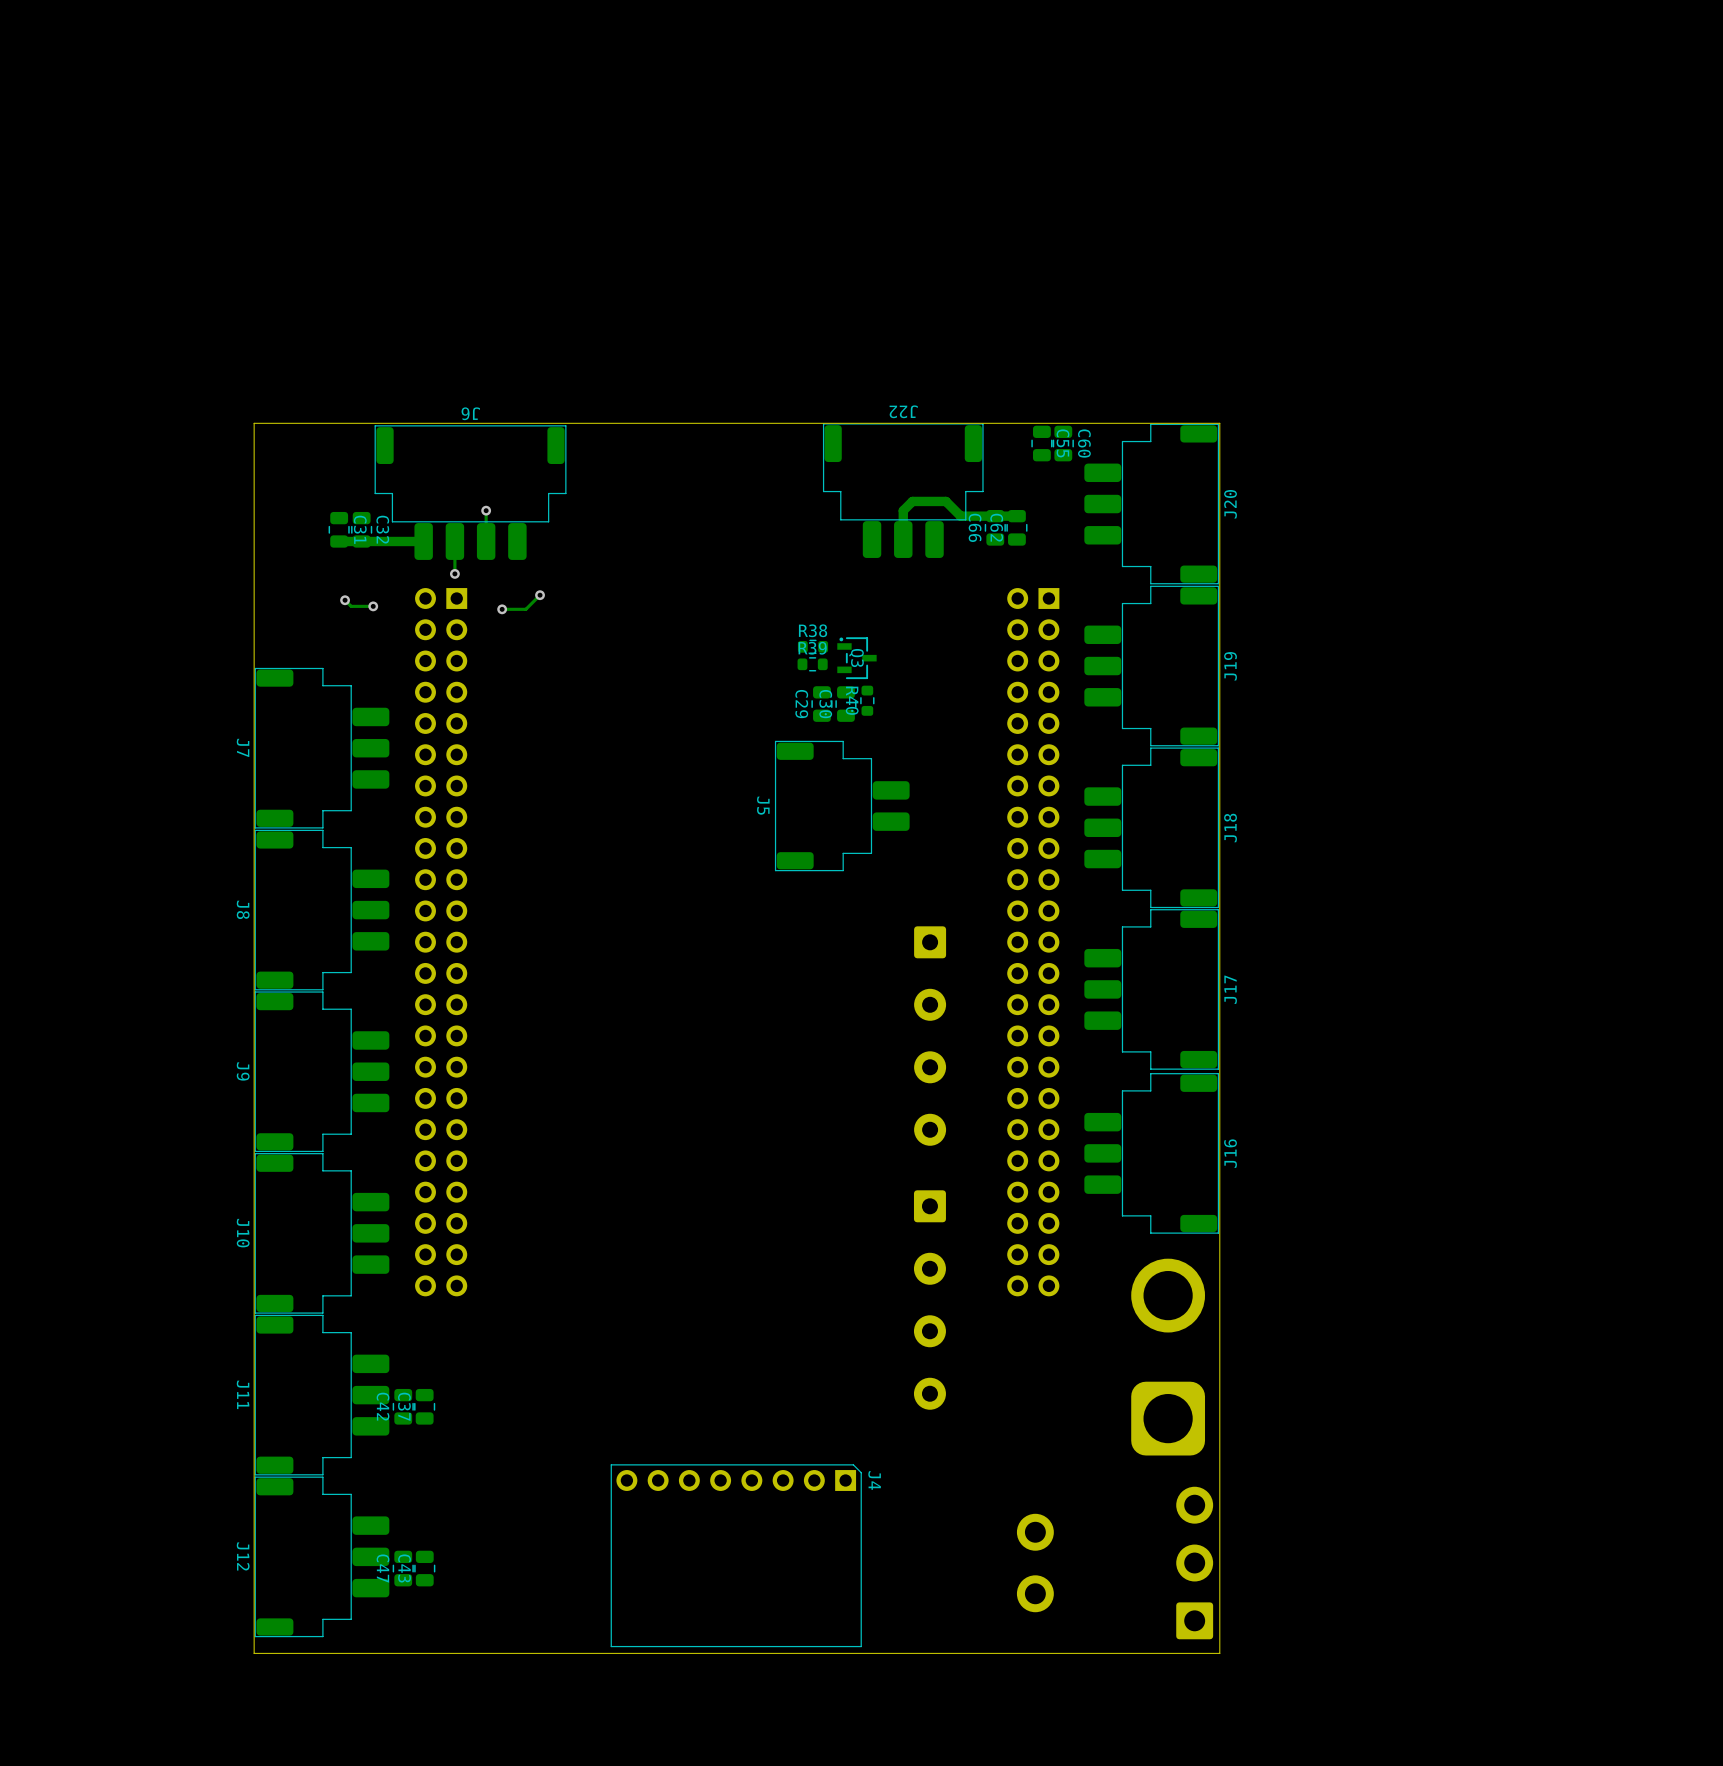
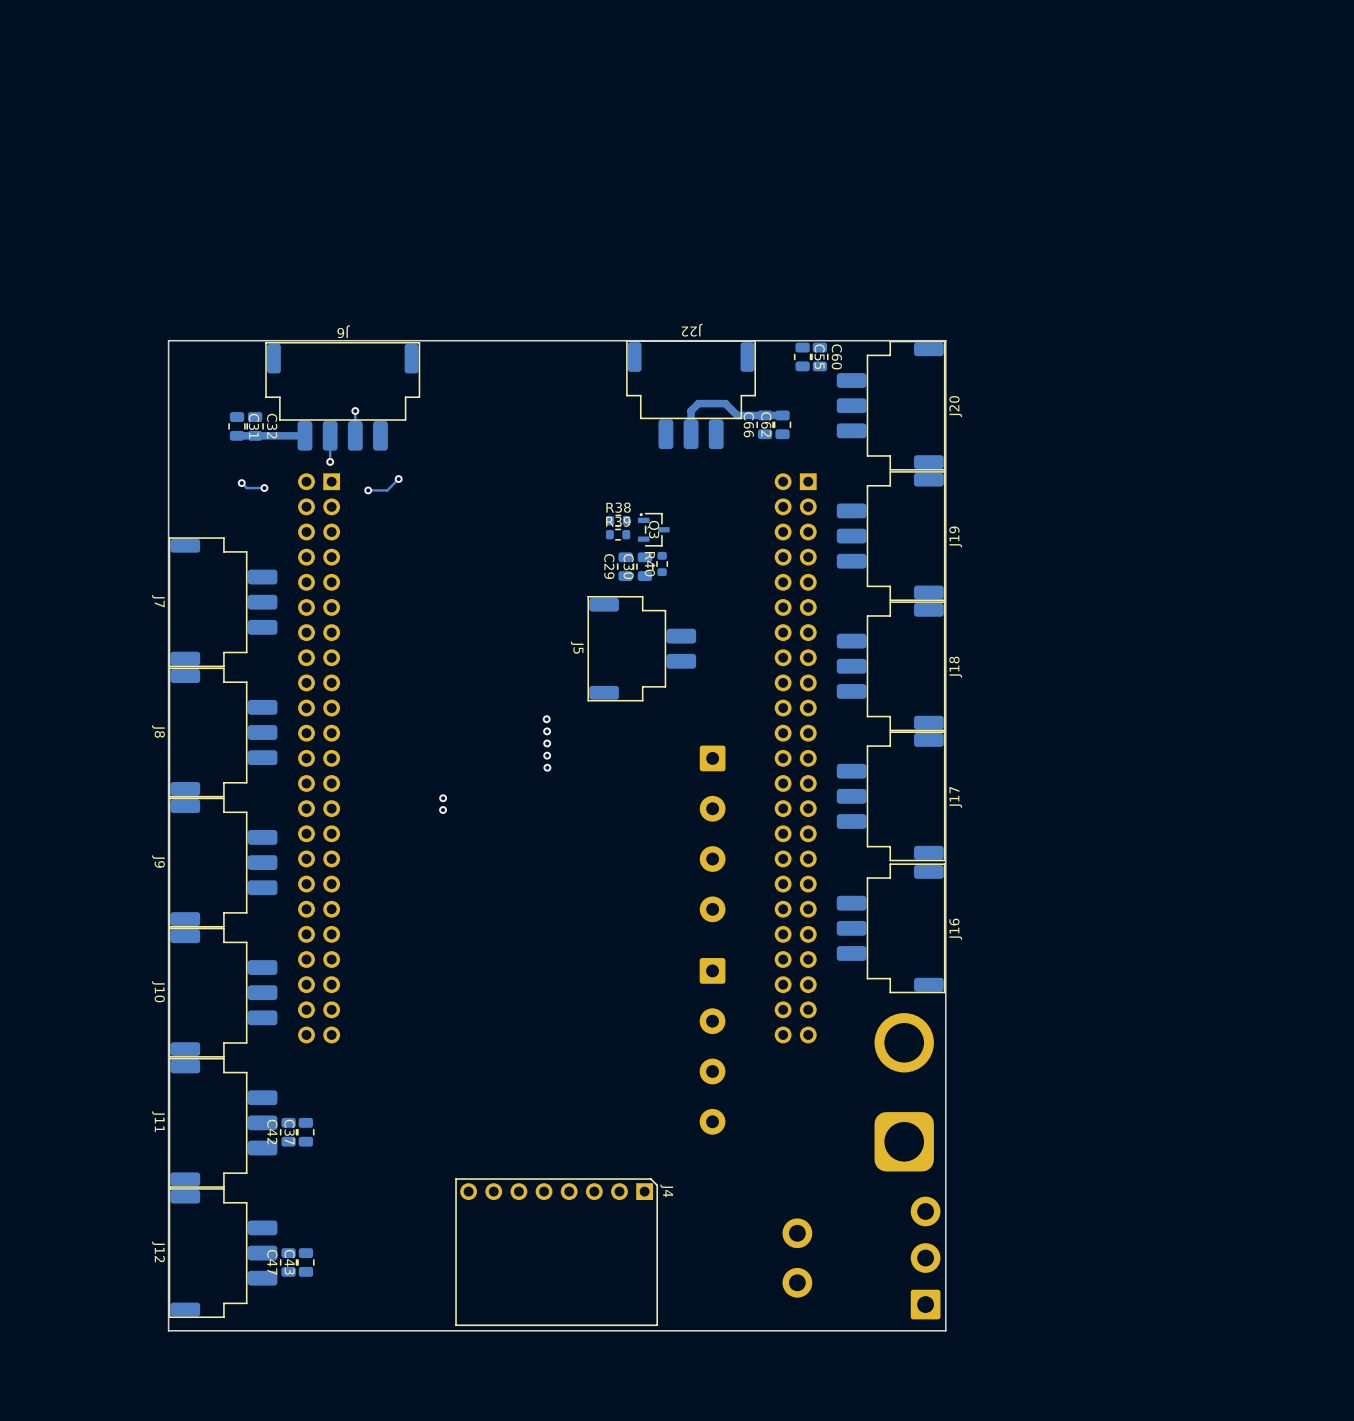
via: none -> (546, 719)
via: none -> (547, 731)
via: none -> (547, 743)
via: none -> (547, 755)
via: none -> (547, 767)
via: none -> (443, 798)
via: none -> (443, 810)

